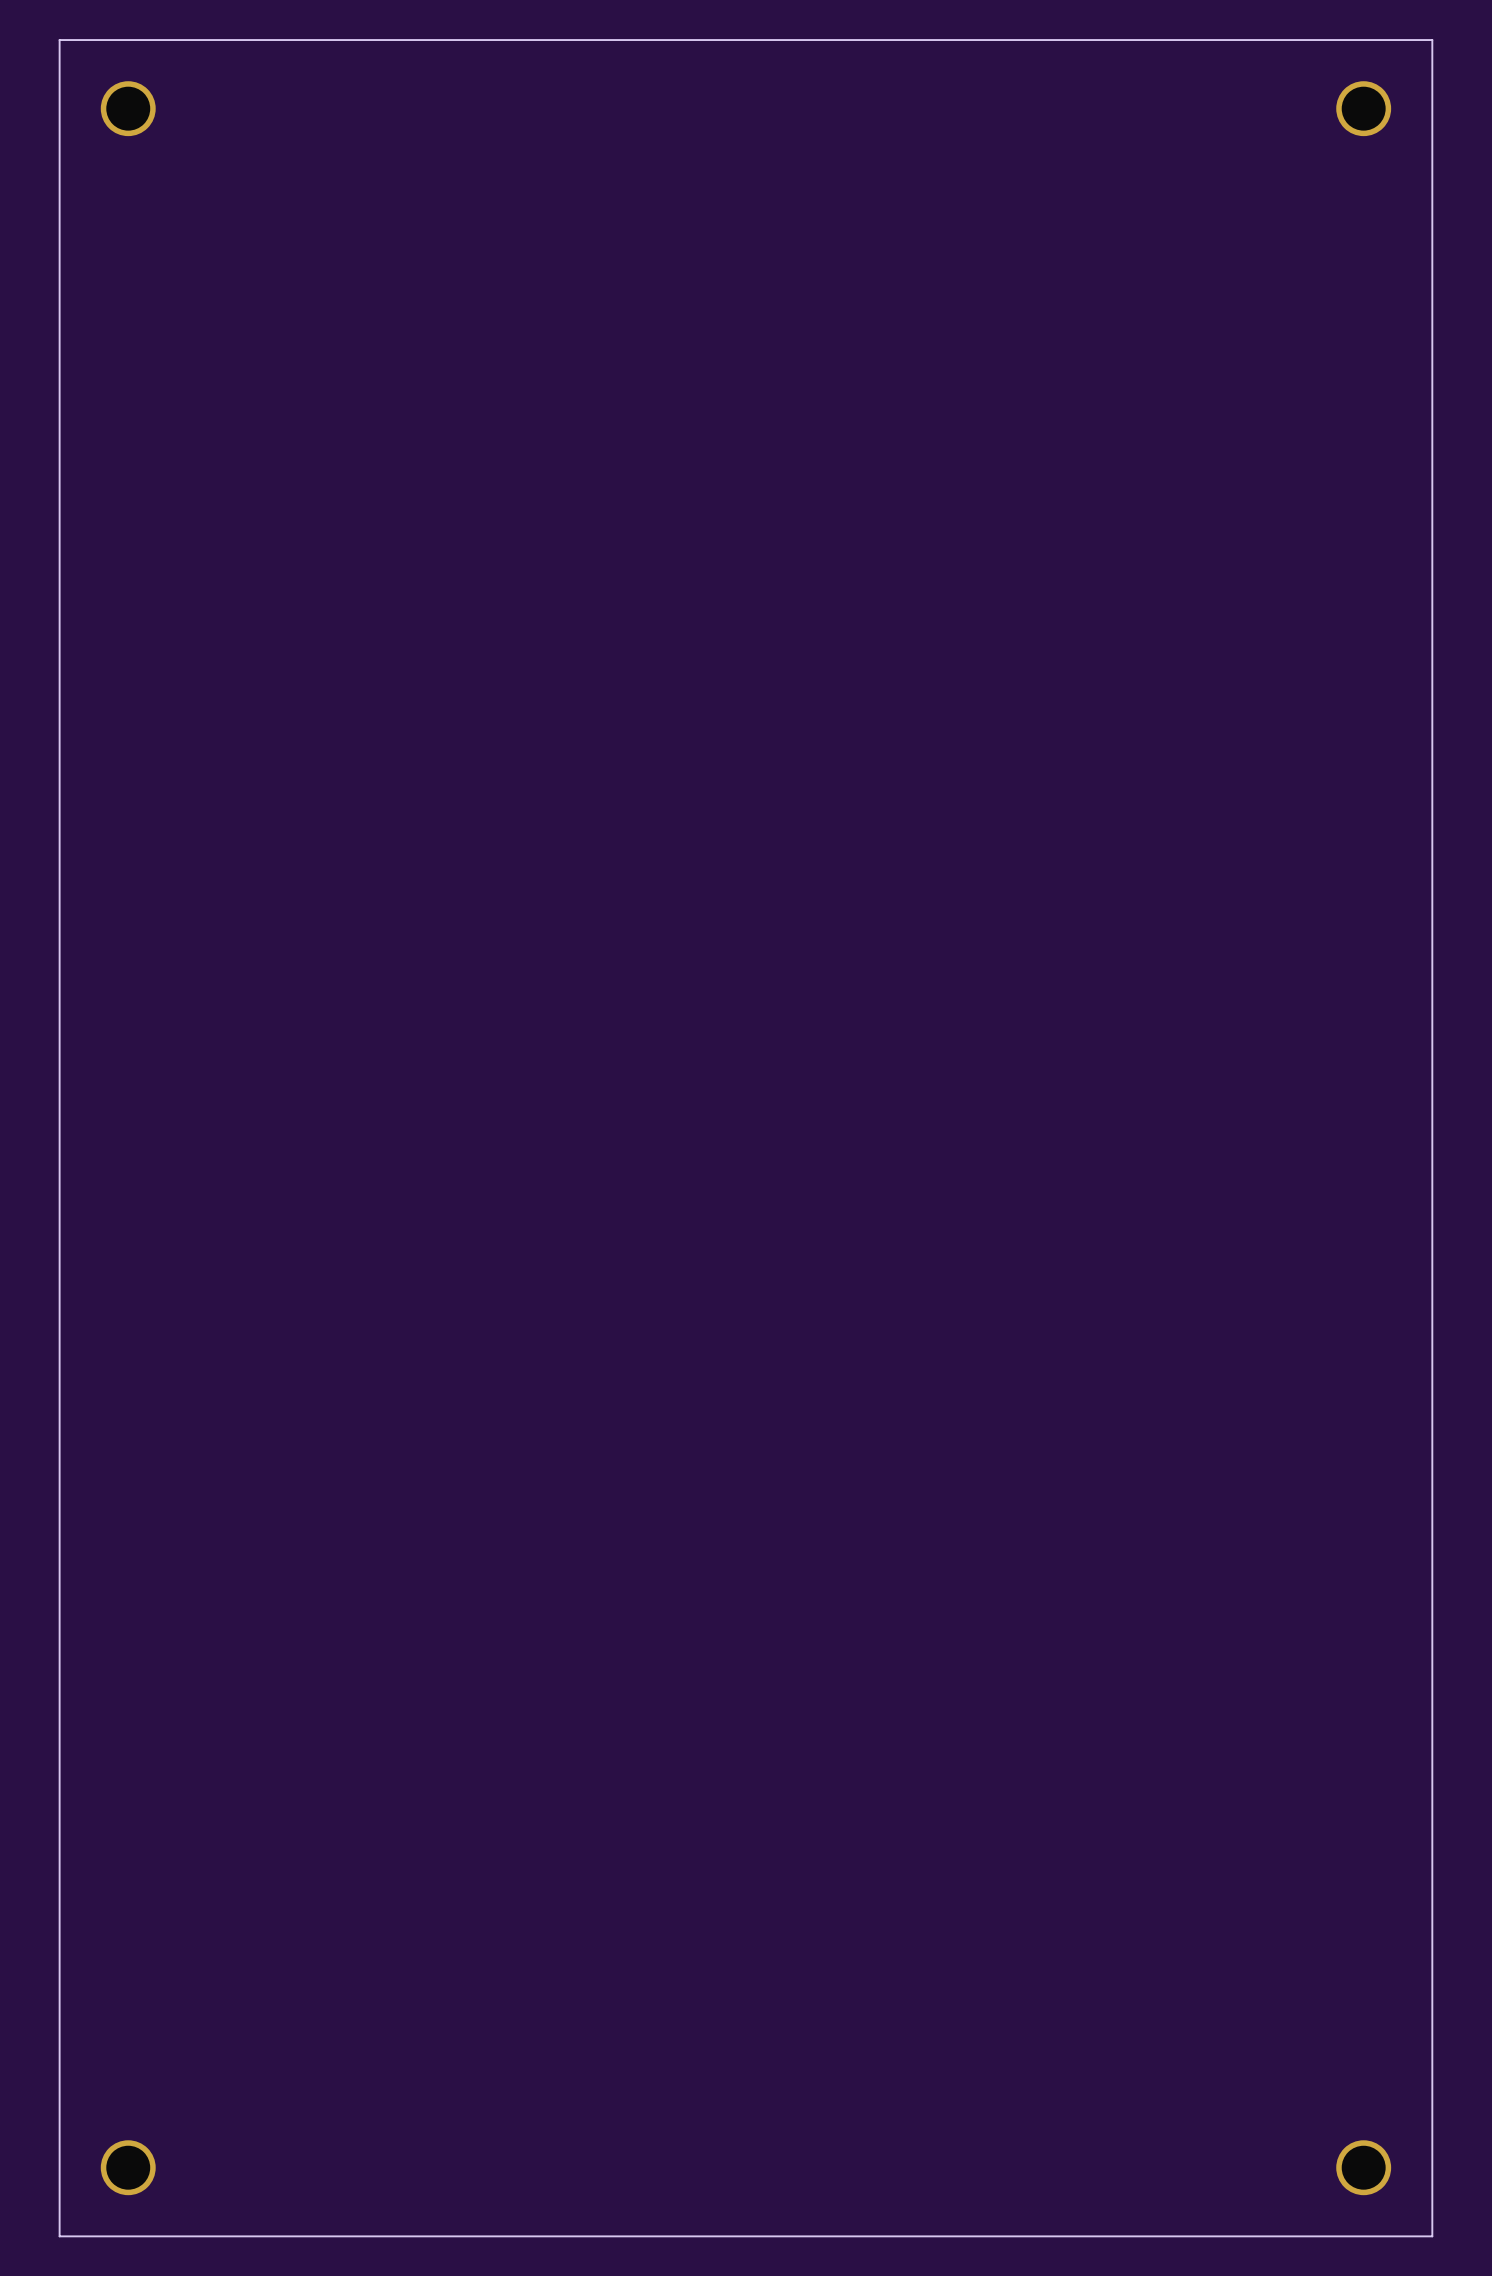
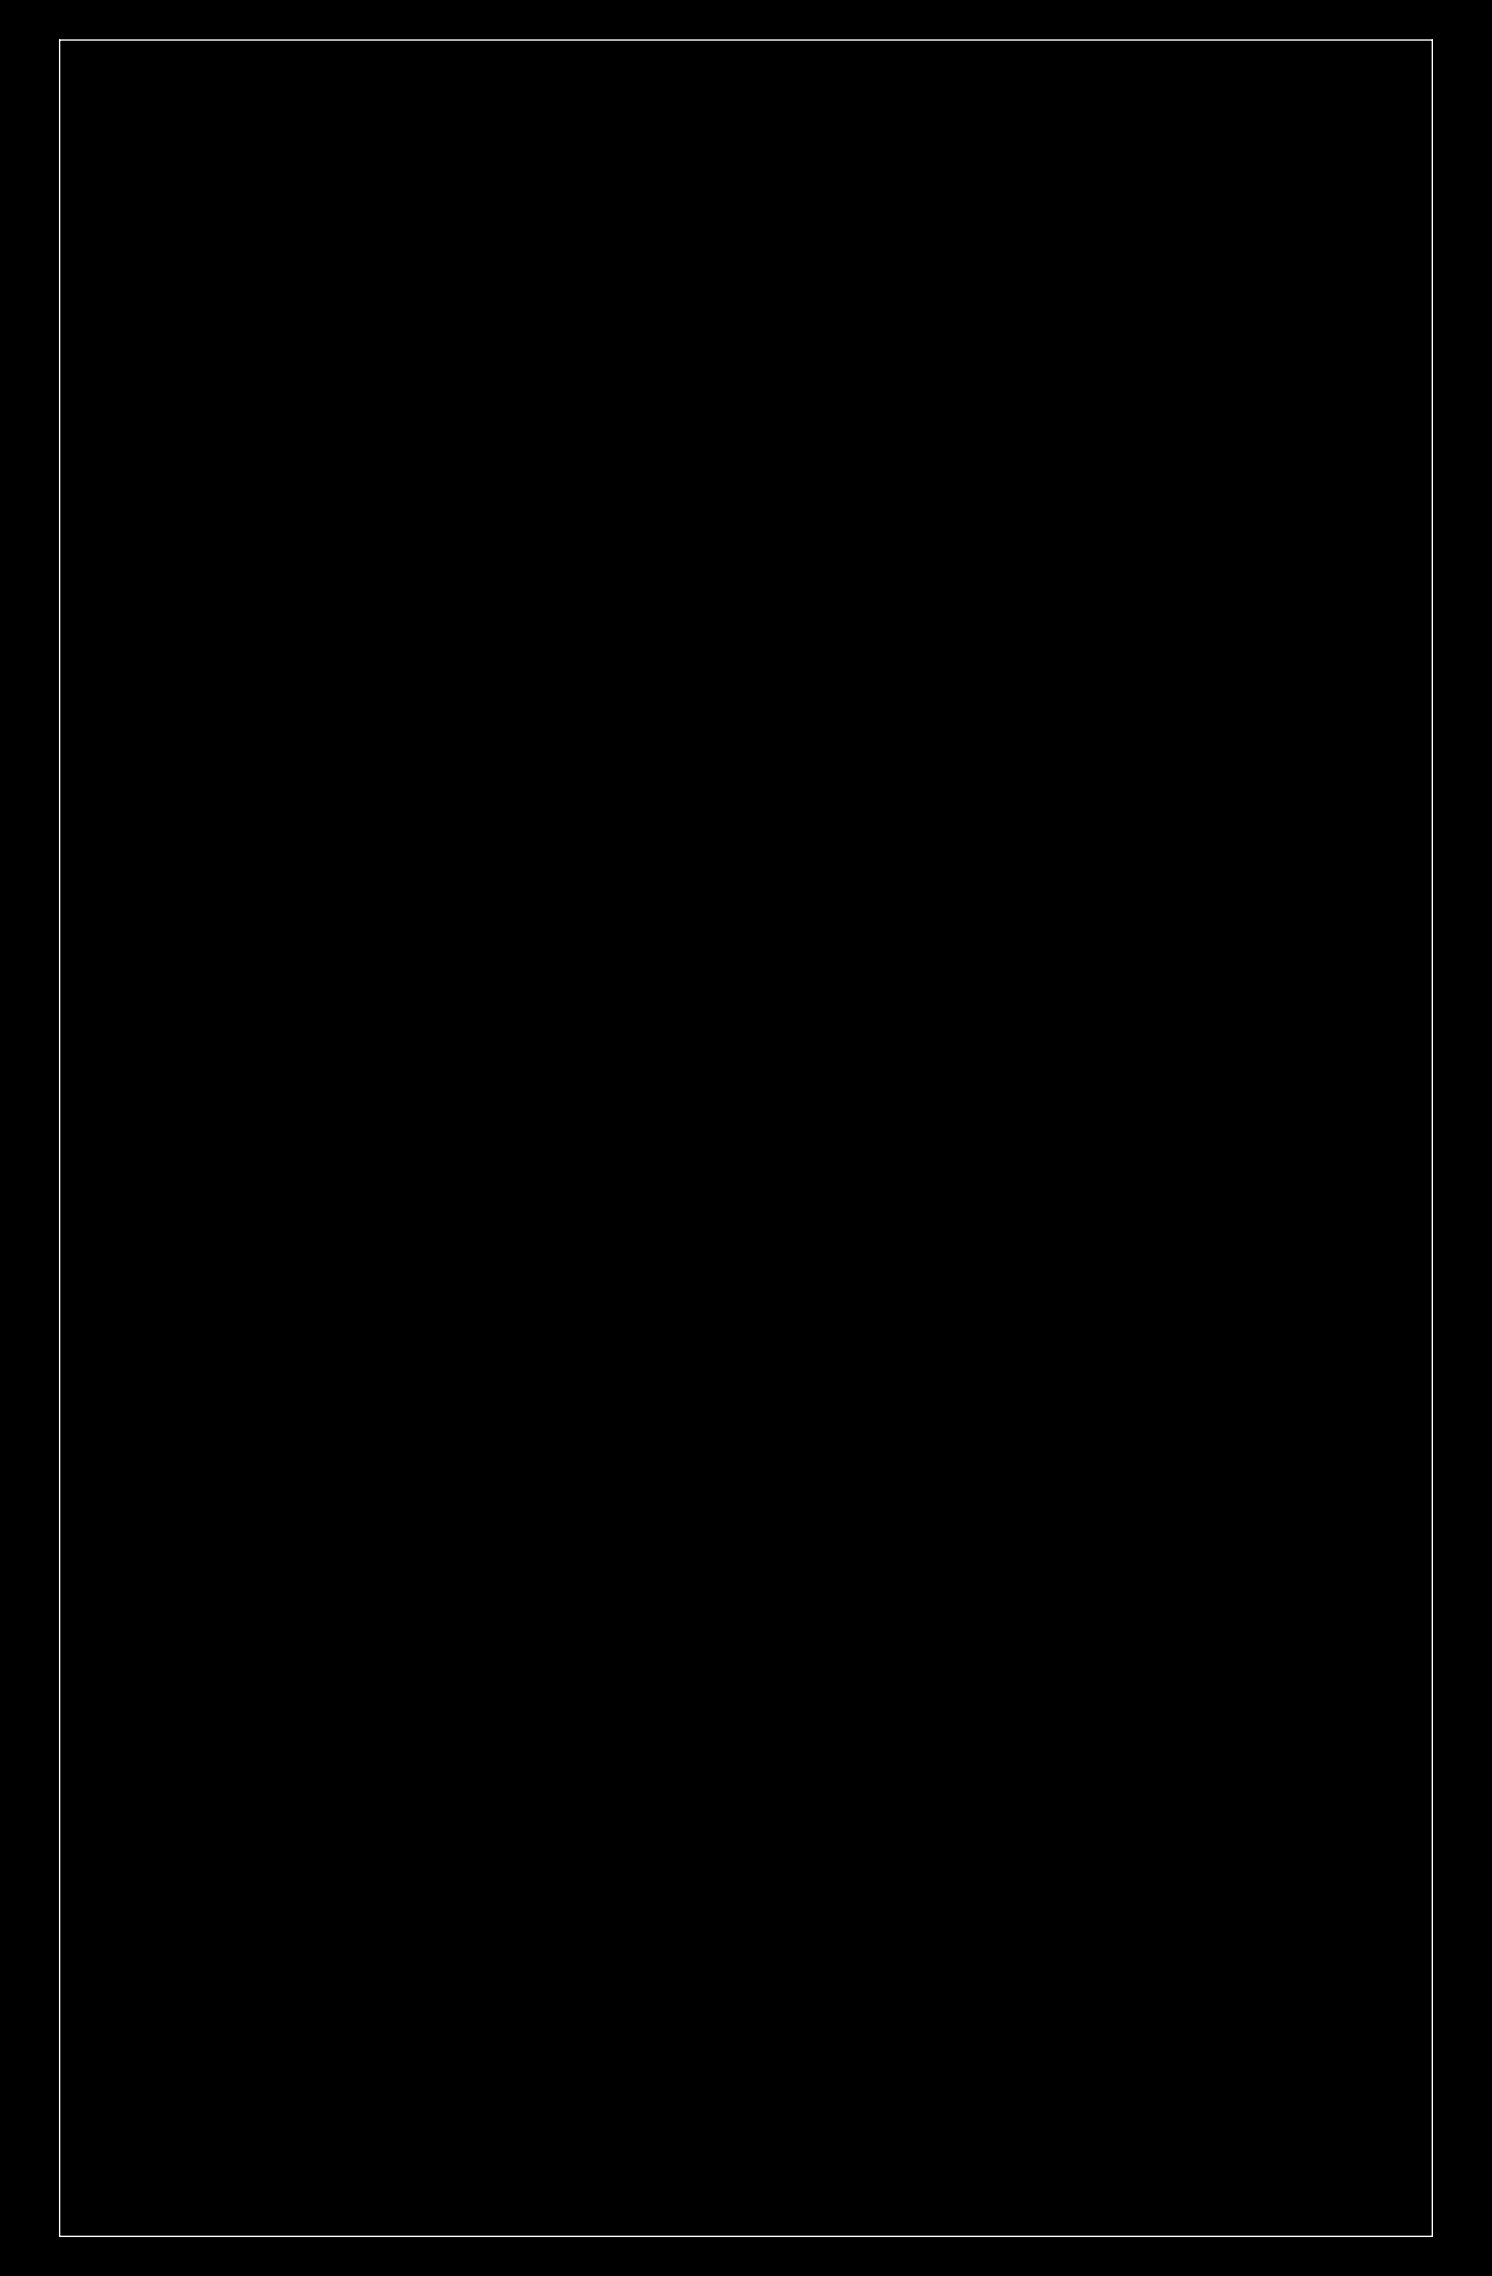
via: (128, 108) -> none
via: (1363, 108) -> none
via: (128, 2167) -> none
via: (1363, 2167) -> none

